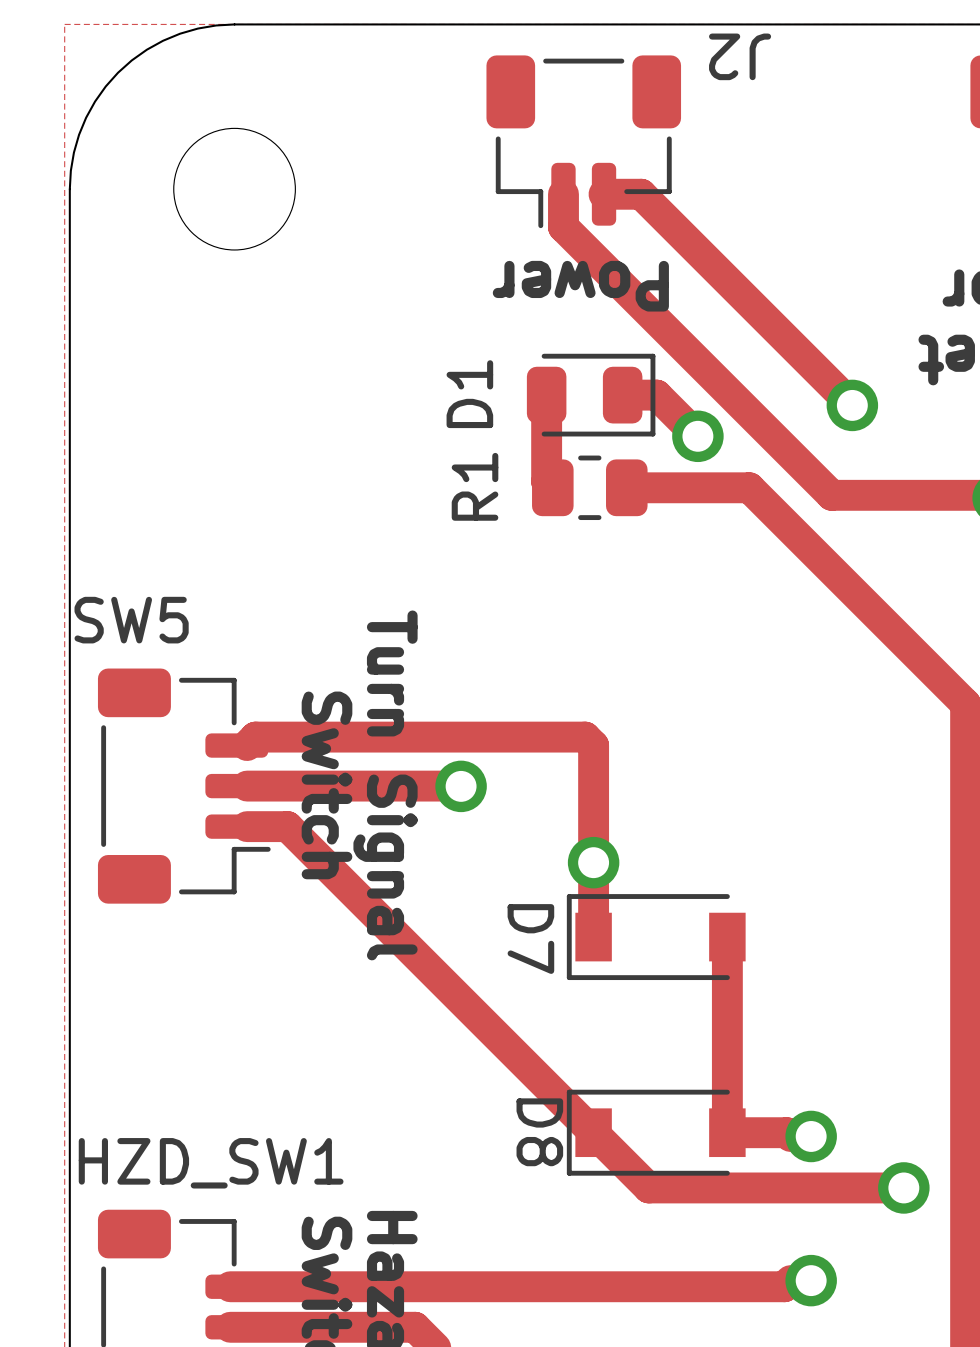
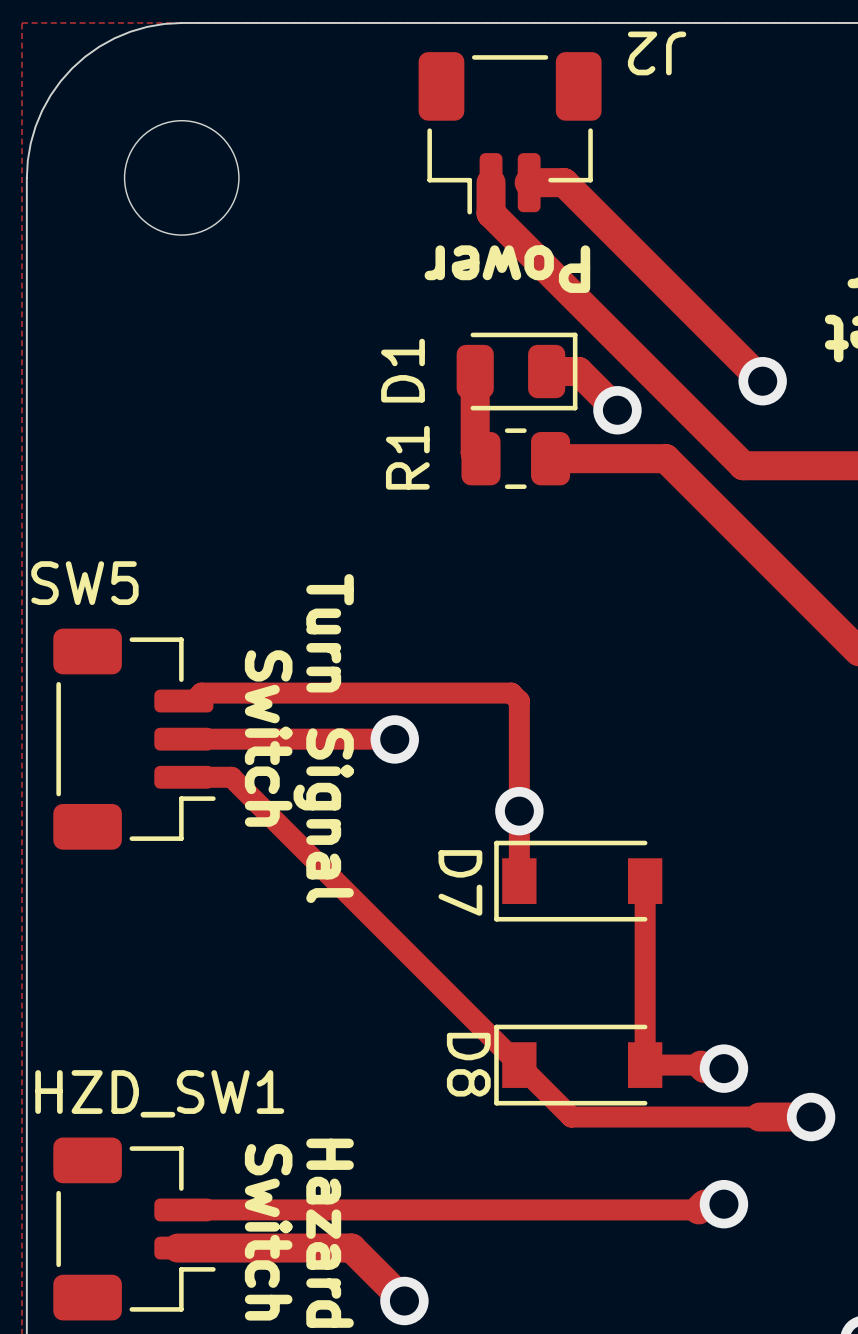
track width: thick (247, 745) (255, 737) (585, 737) (593, 745) (593, 937) -> thin (193, 701) (201, 693) (511, 693) (519, 701) (519, 881)
track width: thick (247, 786) (460, 786) -> thin (193, 739) (394, 739)
track width: thick (247, 826) (287, 826) (648, 1187) (849, 1187) -> thin (193, 777) (231, 777) (571, 1117) (759, 1117)
track width: thick (727, 937) (727, 1132) (786, 1132) -> thin (645, 881) (645, 1065) (701, 1065)
track width: thick (230, 1286) (784, 1286) -> thin (177, 1209) (698, 1209)

